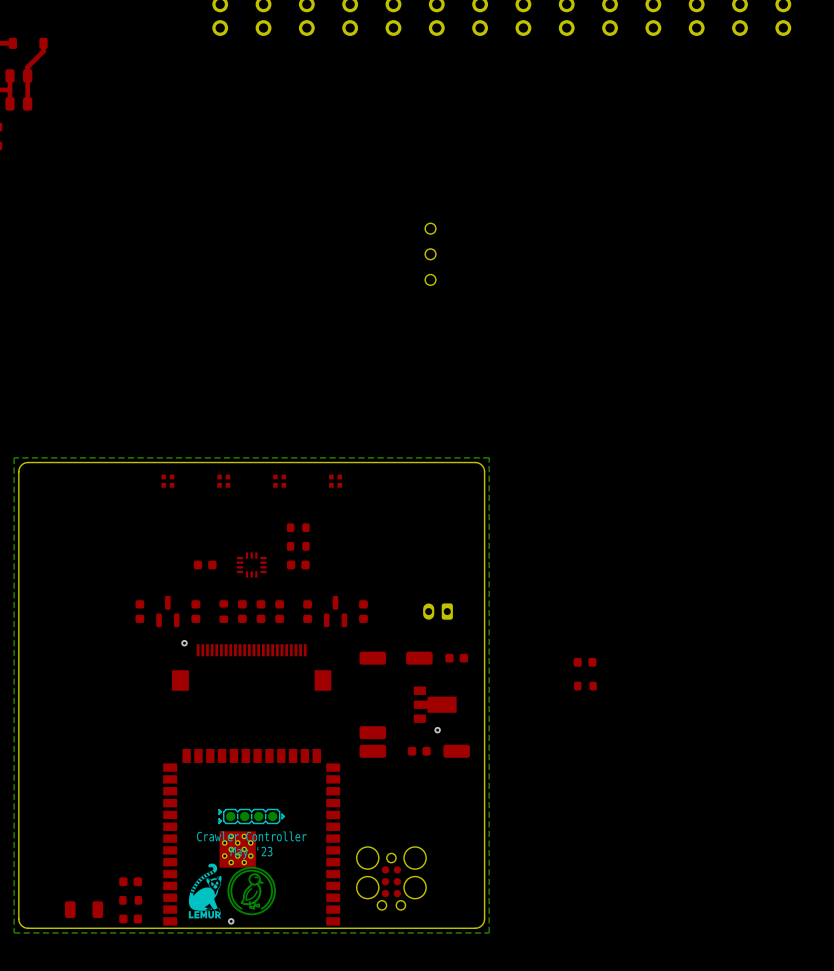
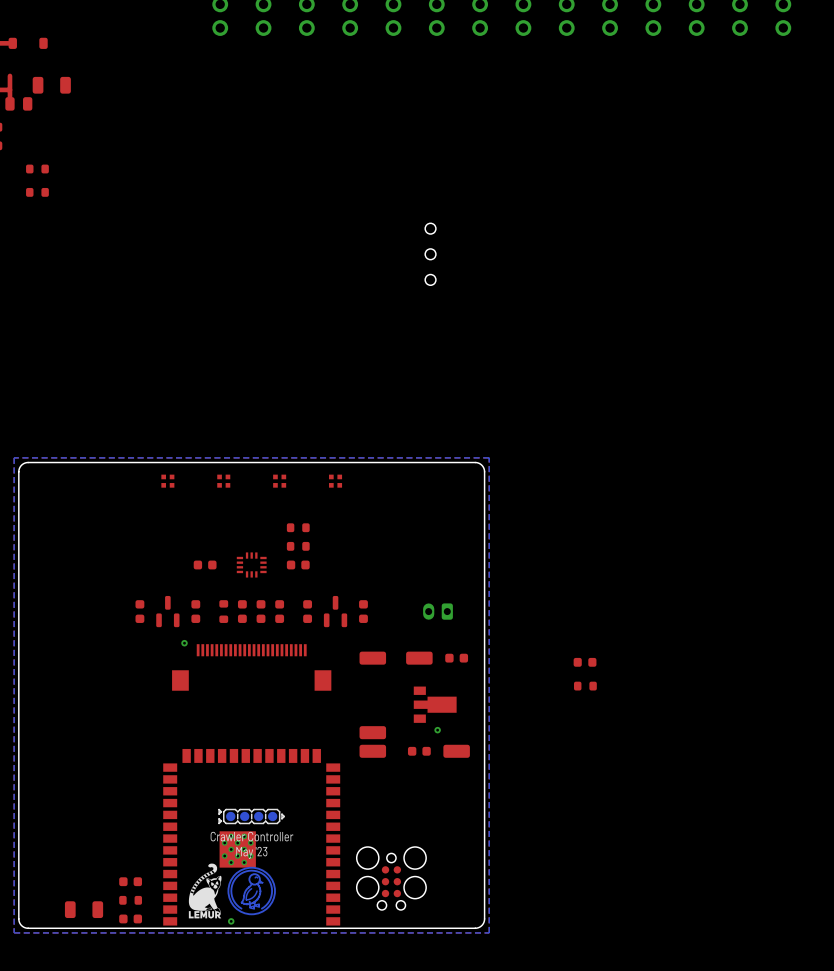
top track: (43, 43) (43, 51) (27, 67) (27, 103) -> none
part: (18, 75) -> none
part: none -> (51, 85)
part: none -> (37, 169)
part: none -> (37, 192)

